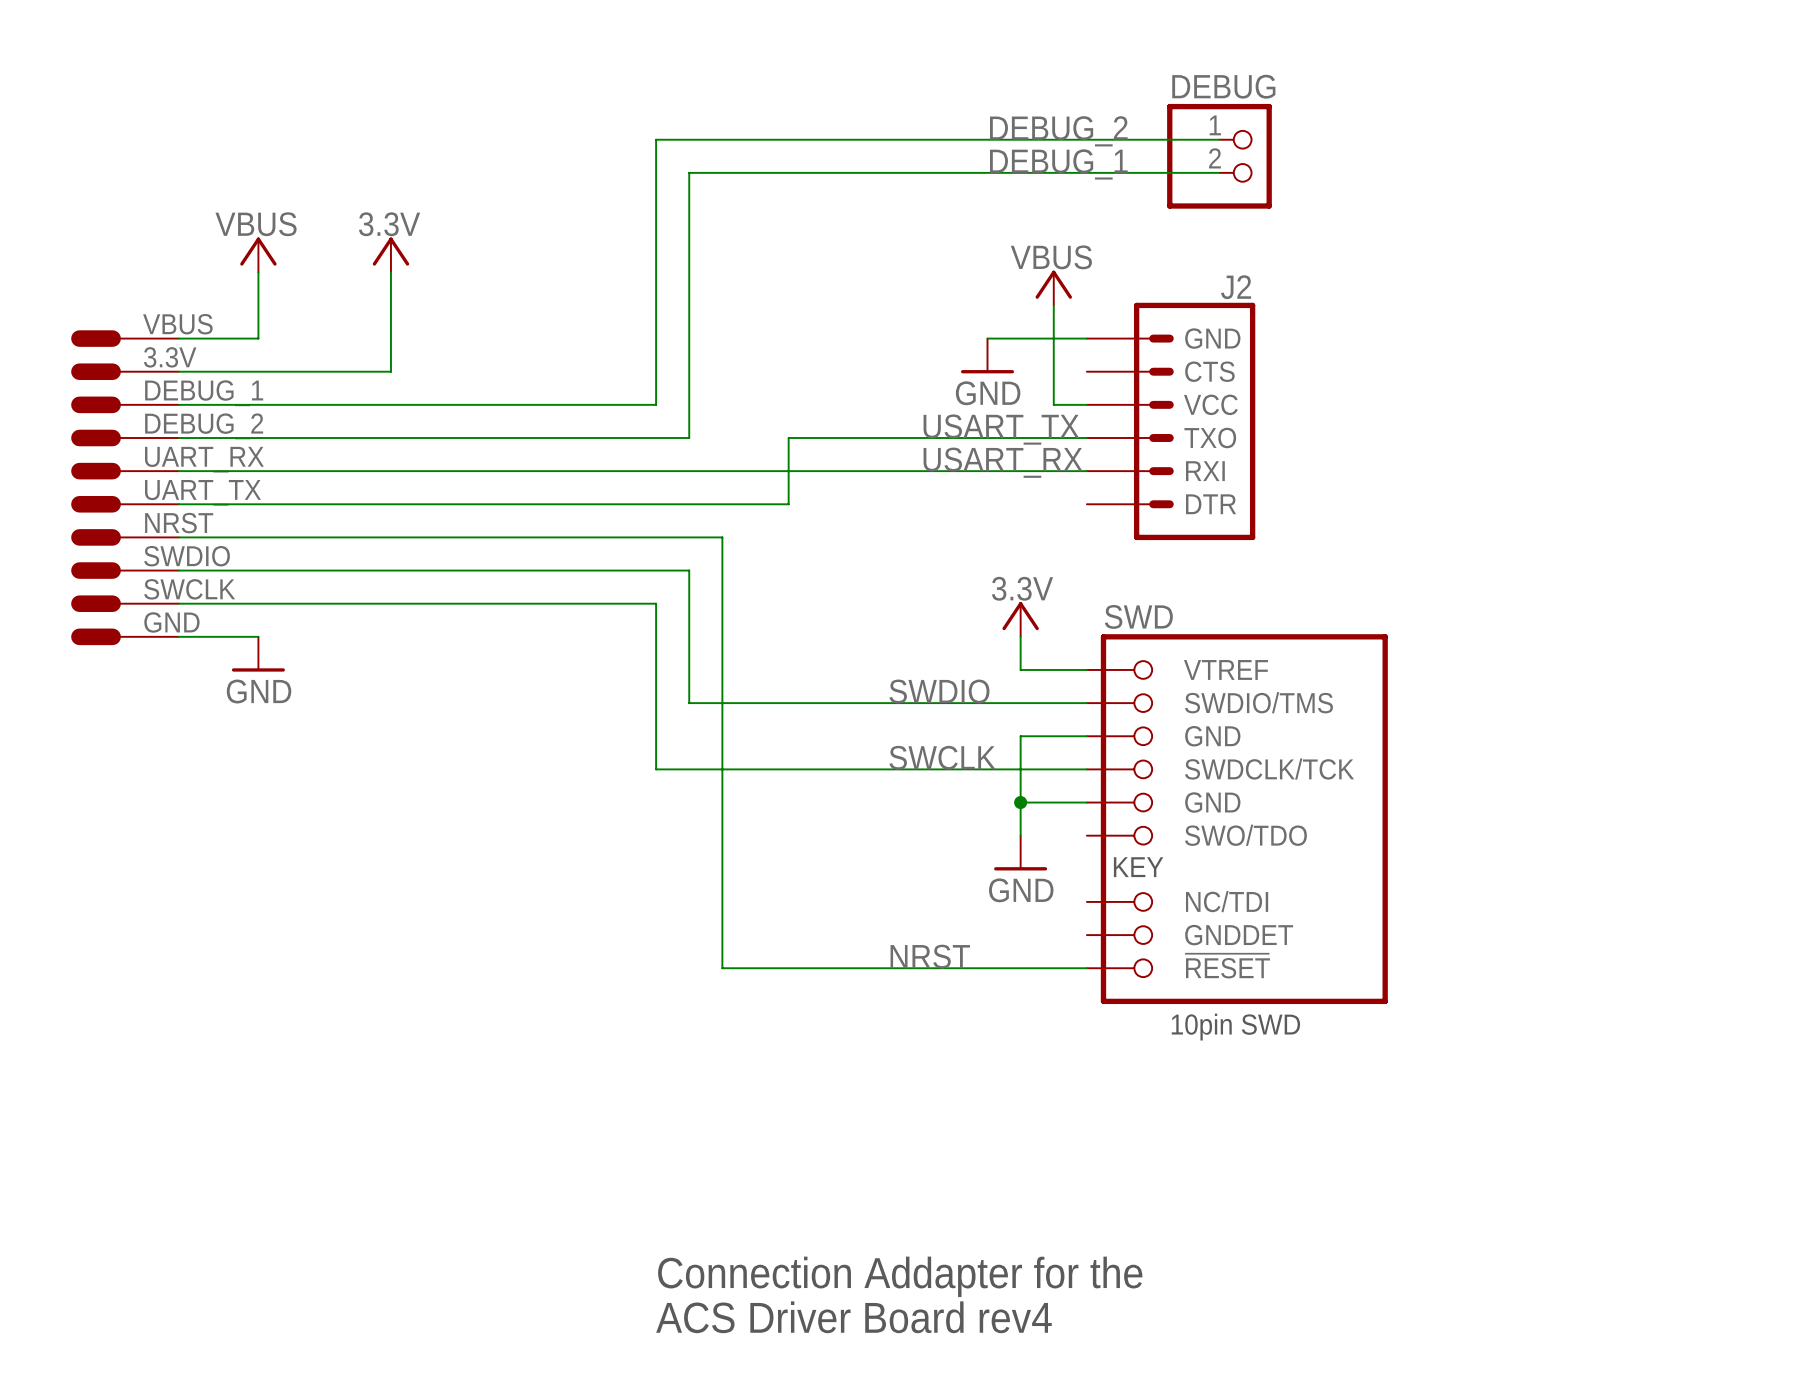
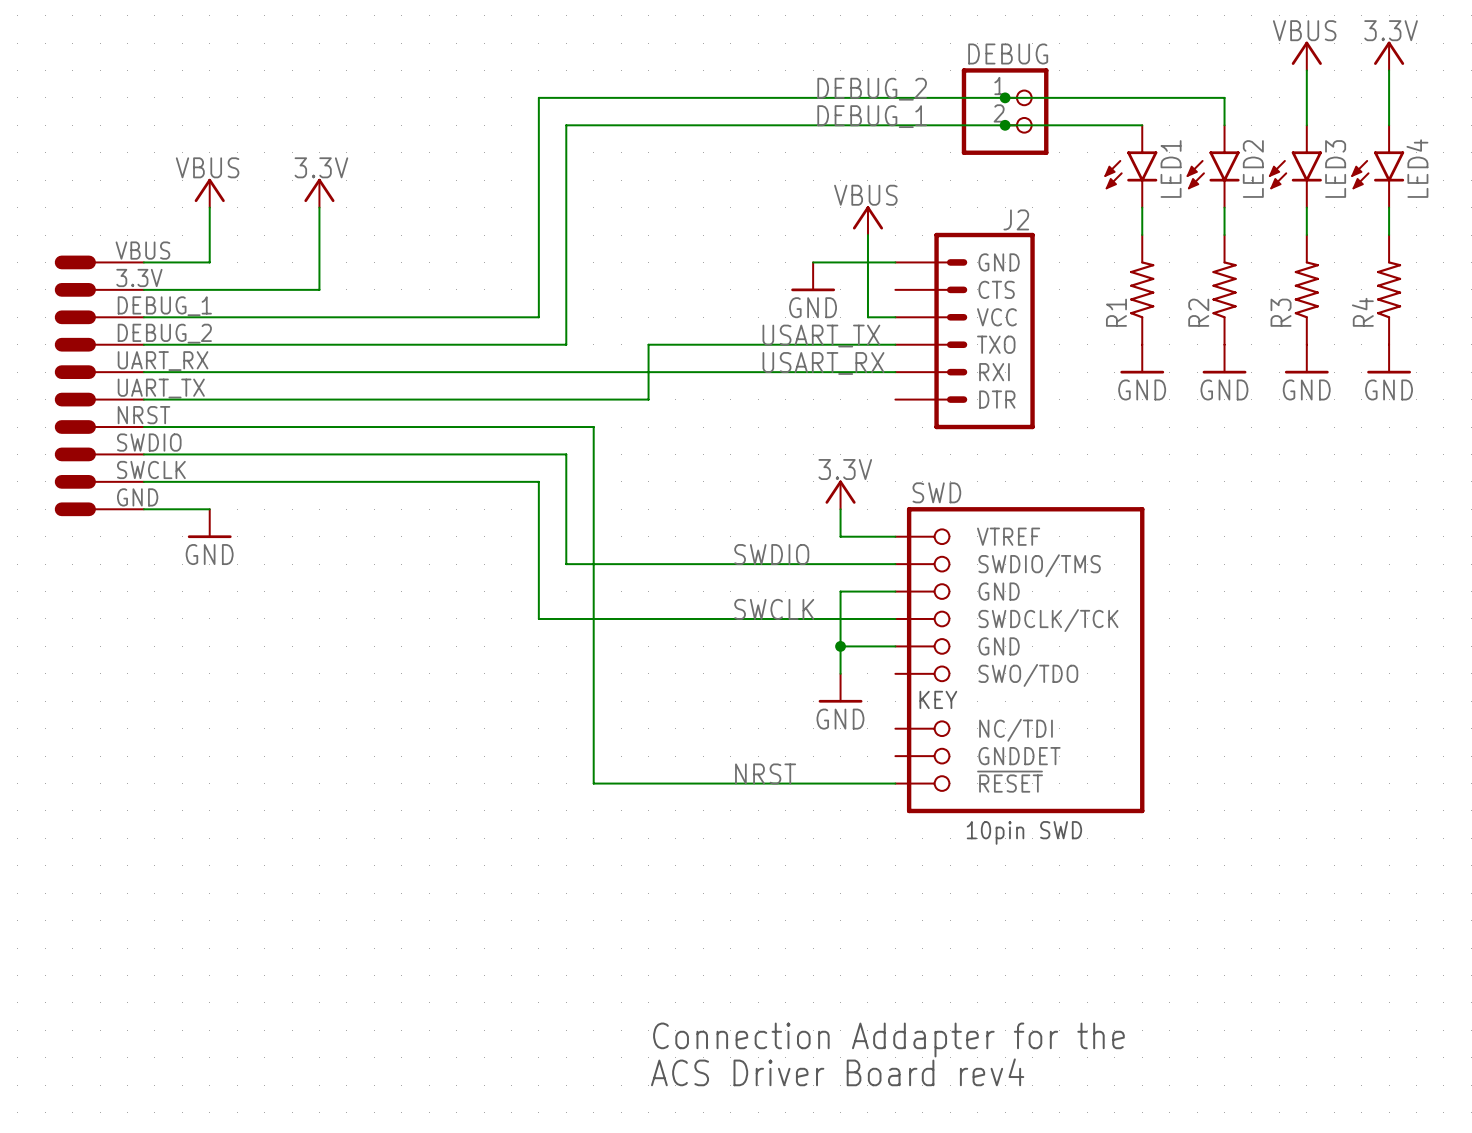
power symbol: none -> VBUS (1306, 56)
power symbol: none -> 3.3V (1389, 56)
wire: none -> (1306, 70) (1306, 125)
wire: none -> (1389, 70) (1389, 125)
wire: none -> (1005, 97) (1224, 97) (1224, 125)
junction: none -> (1005, 97)
wire: none -> (1005, 125) (1142, 125)
junction: none -> (1005, 125)
LED1: none -> (1130, 166)
LED2: none -> (1213, 166)
LED3: none -> (1295, 166)
LED4: none -> (1377, 166)
wire: none -> (1142, 207) (1142, 235)
wire: none -> (1224, 207) (1224, 235)
wire: none -> (1306, 207) (1306, 235)
wire: none -> (1389, 207) (1389, 235)
R1: none -> (1142, 289)
R2: none -> (1224, 289)
R3: none -> (1306, 289)
R4: none -> (1389, 289)
power symbol: none -> GND (1142, 359)
power symbol: none -> GND (1224, 359)
power symbol: none -> GND (1306, 359)
power symbol: none -> GND (1389, 359)
text position: Connection Addapter for the (900, 1276) -> Connection Addapter for the (888, 1040)
text position: ACS Driver Board rev4 (853, 1317) -> ACS Driver Board rev4 (837, 1072)

